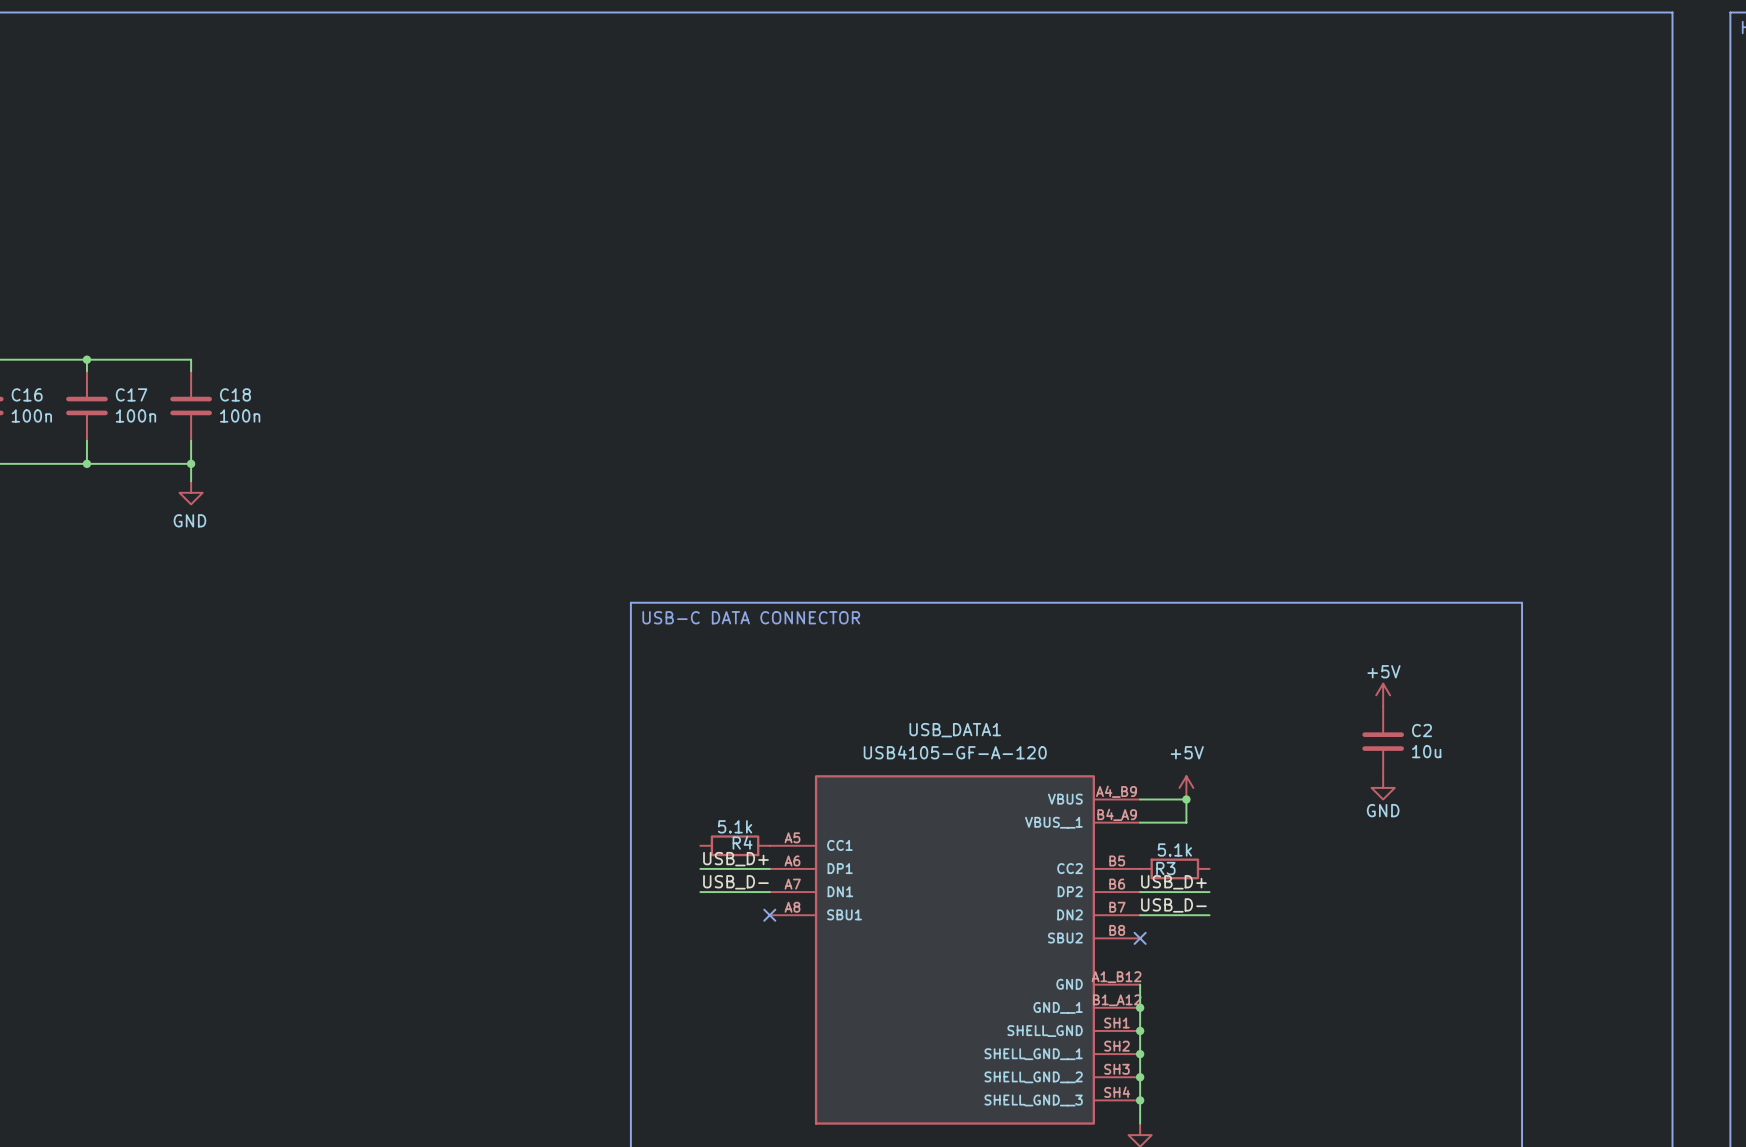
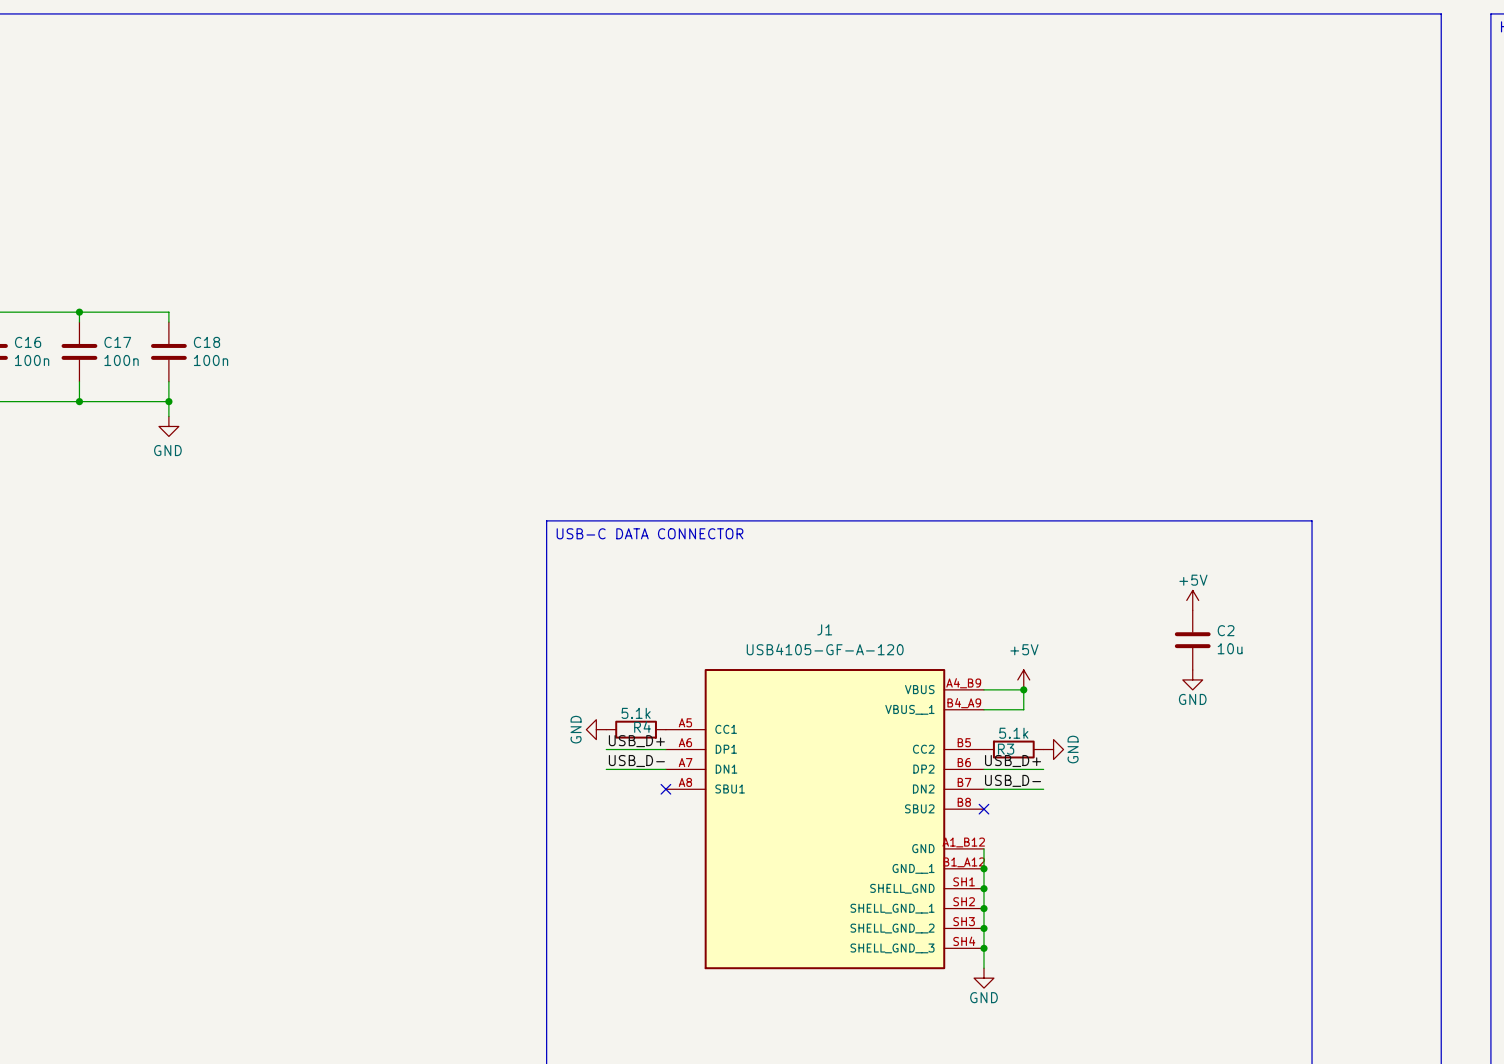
USB_DATA1 name: USB_DATA1 (955, 730) -> J1 (824, 629)
power symbol: none -> GND (596, 729)
power symbol: none -> GND (1053, 749)

